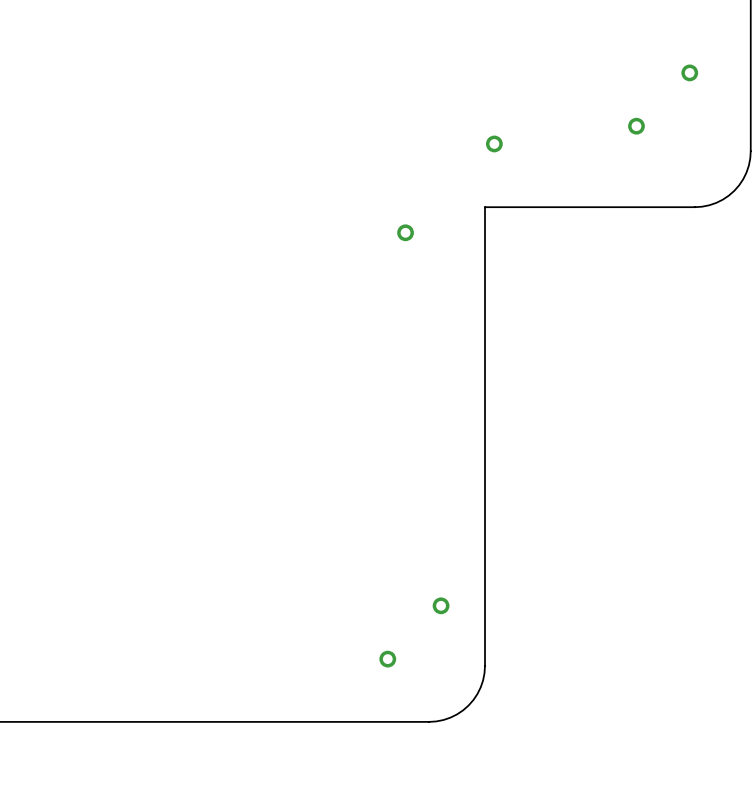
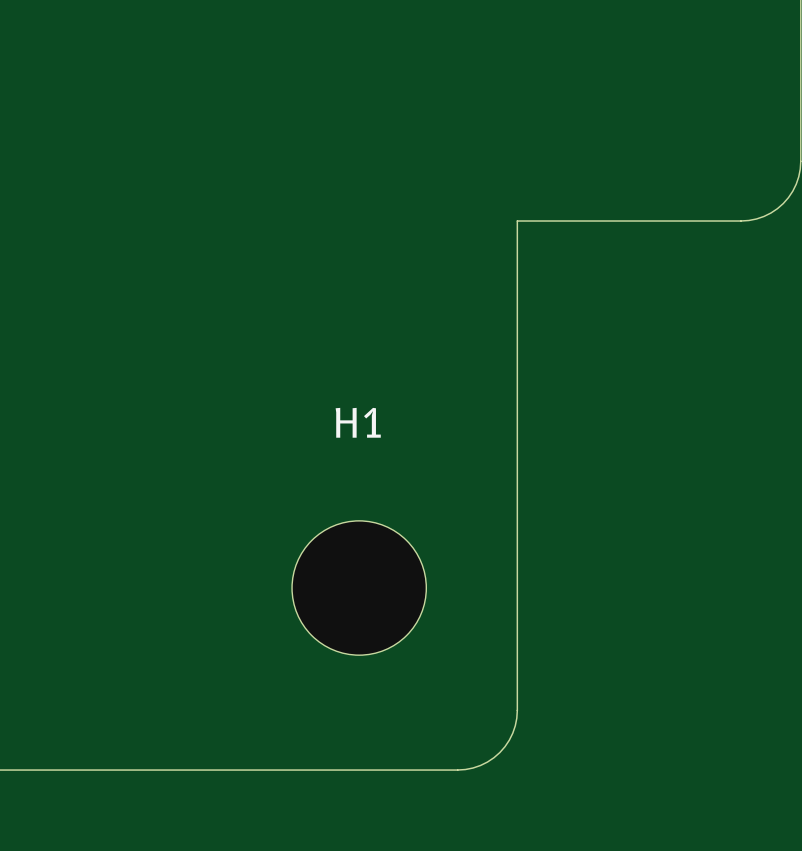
via: (689, 72) -> none
via: (636, 126) -> none
via: (494, 143) -> none
via: (405, 232) -> none
H1: none -> (359, 588)
via: (441, 605) -> none
via: (387, 659) -> none

